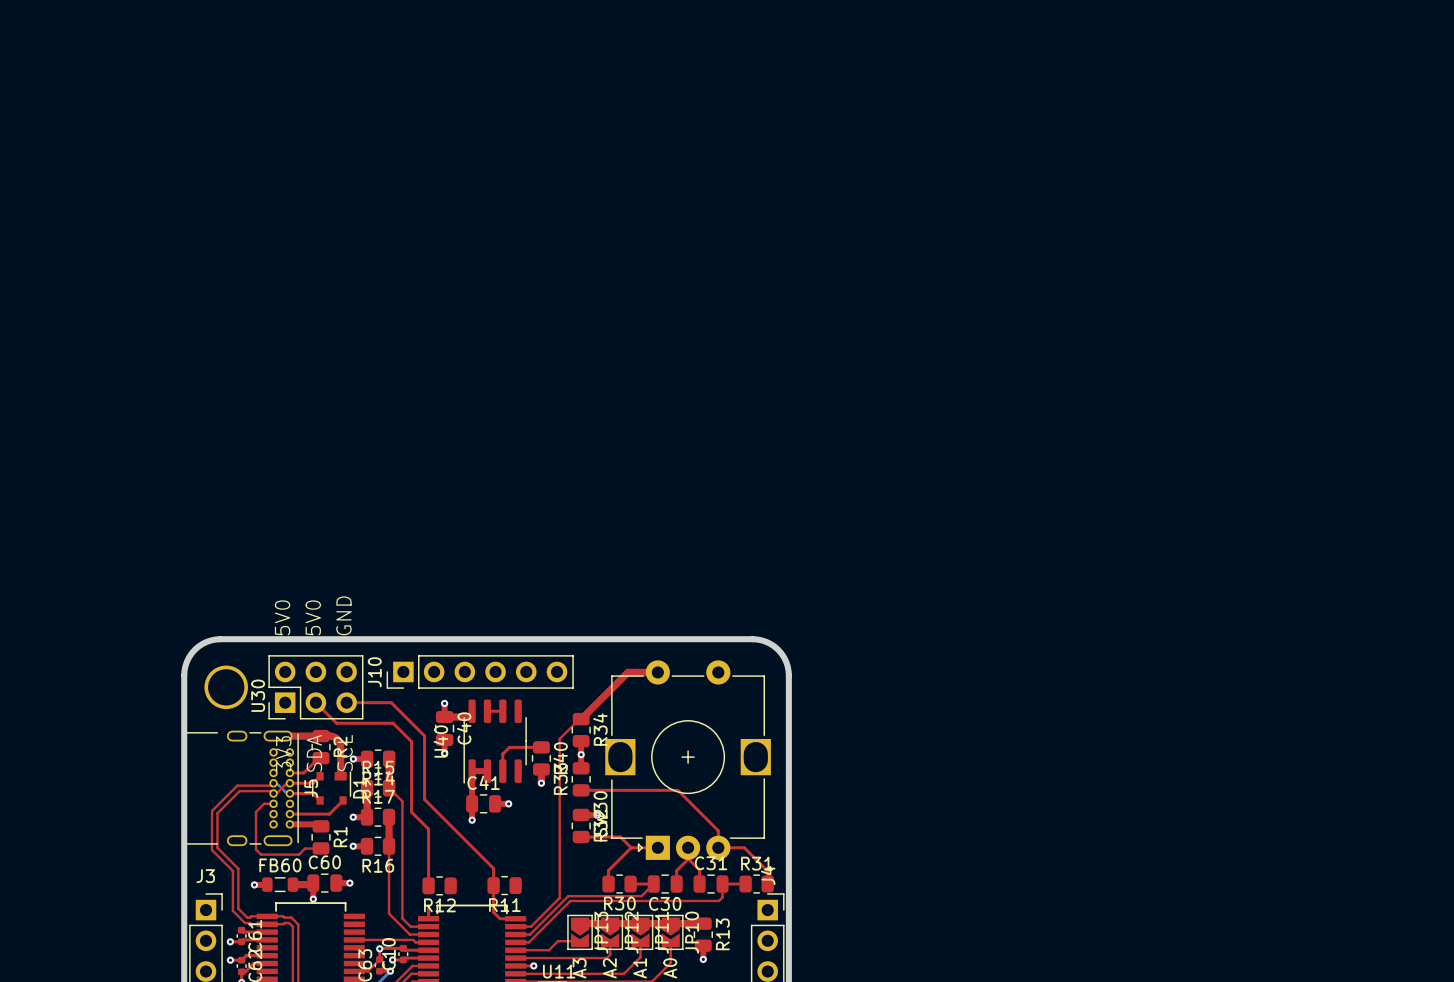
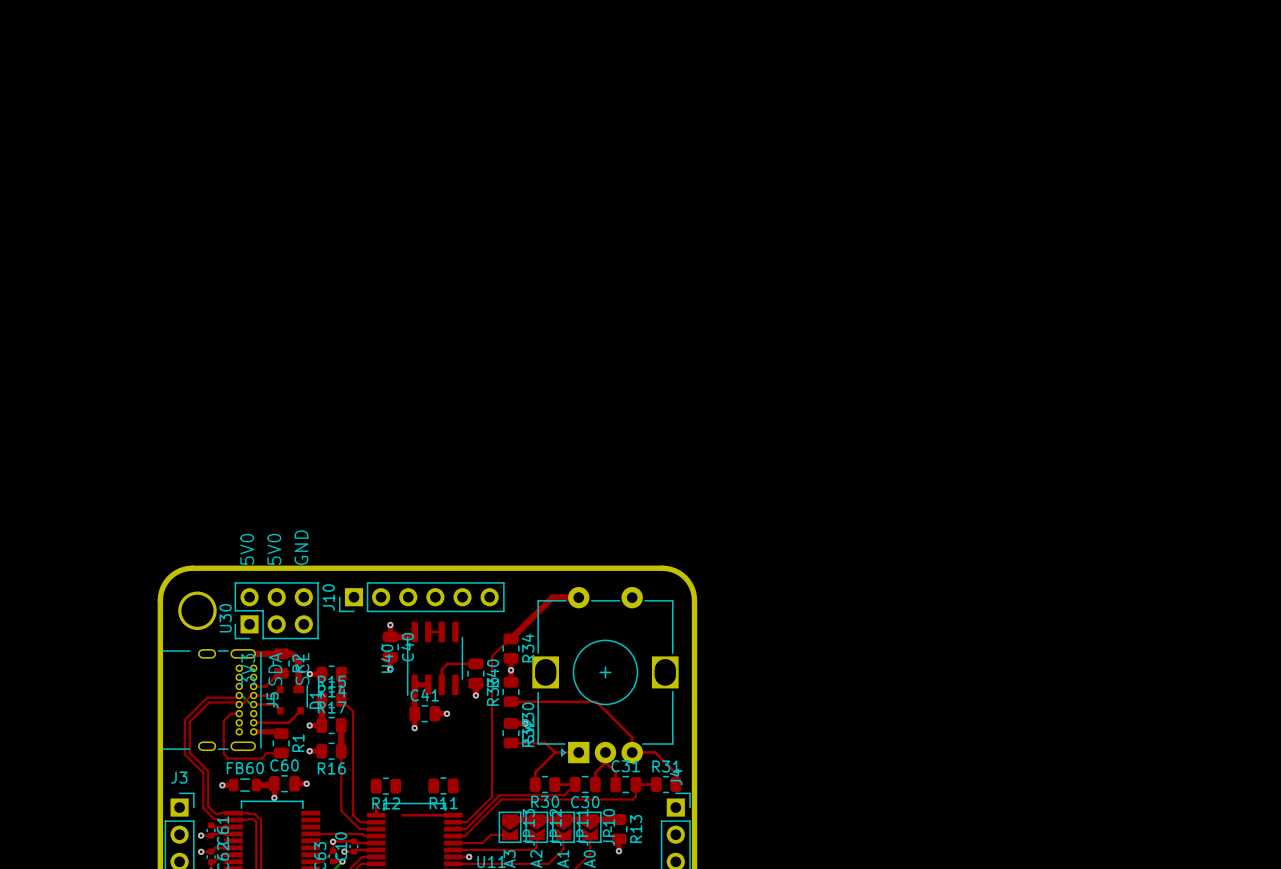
top track: (315, 702) (336, 723) (393, 723) (411, 741) (411, 812) (428, 829) (428, 885) -> none
top track: (346, 702) (391, 702) (424, 735) (424, 799) (493, 868) (493, 912) (500, 918) -> (402, 815) (439, 815)

